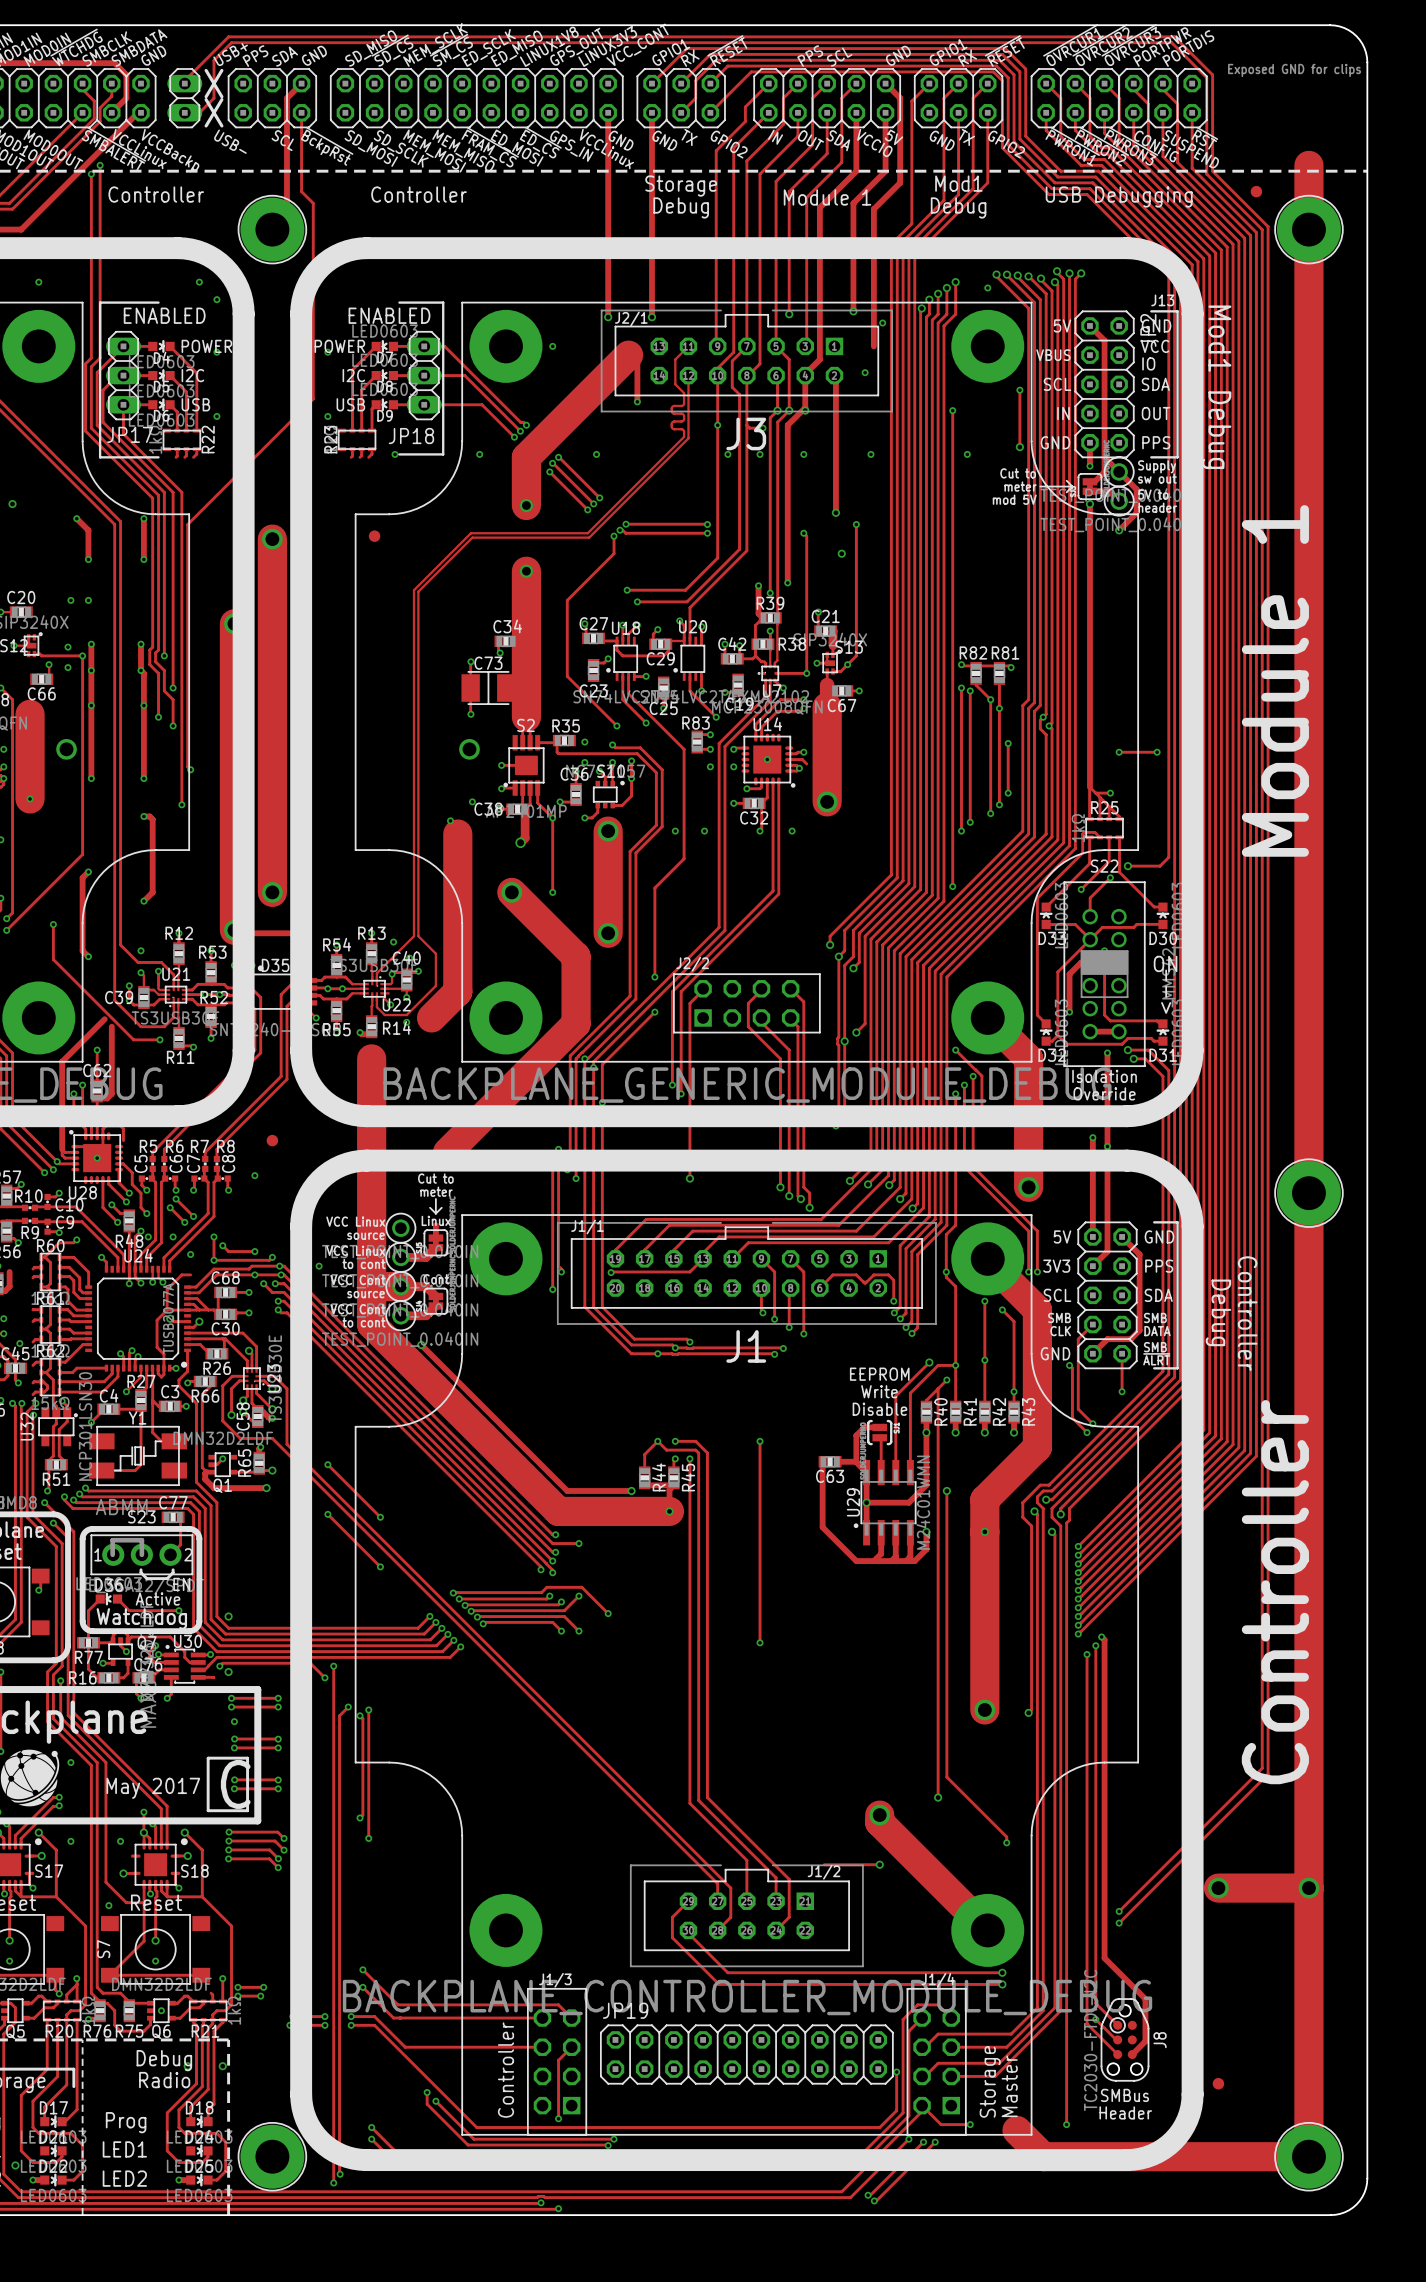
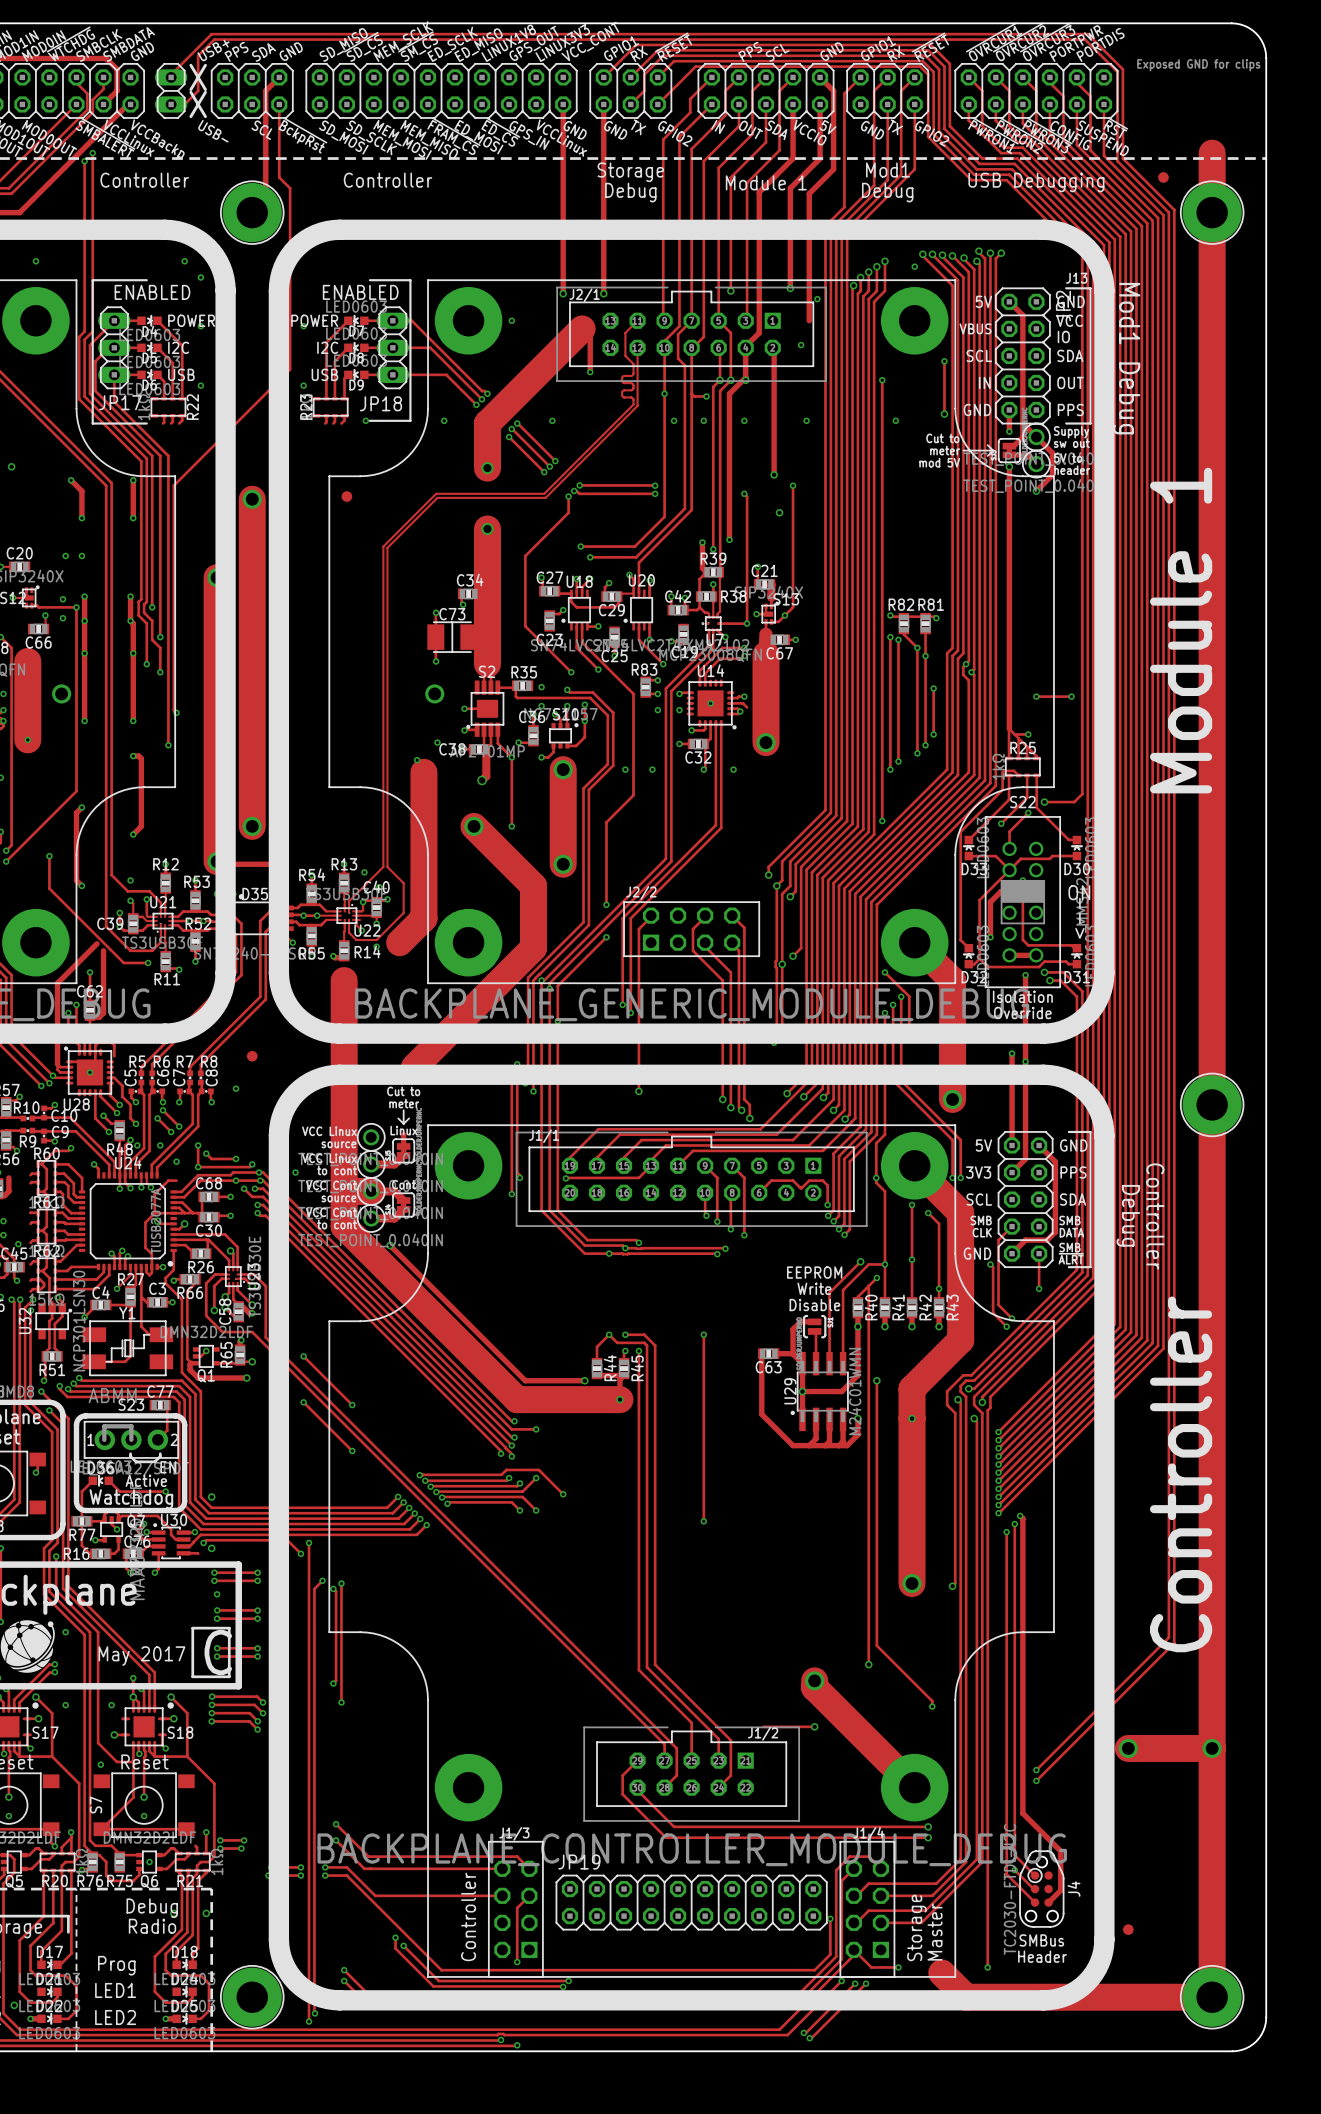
J3 name: J3 (746, 433) -> none
J1 name: J1 (746, 1346) -> none
J8 name: J8 (1160, 2040) -> J4 (1074, 1889)

